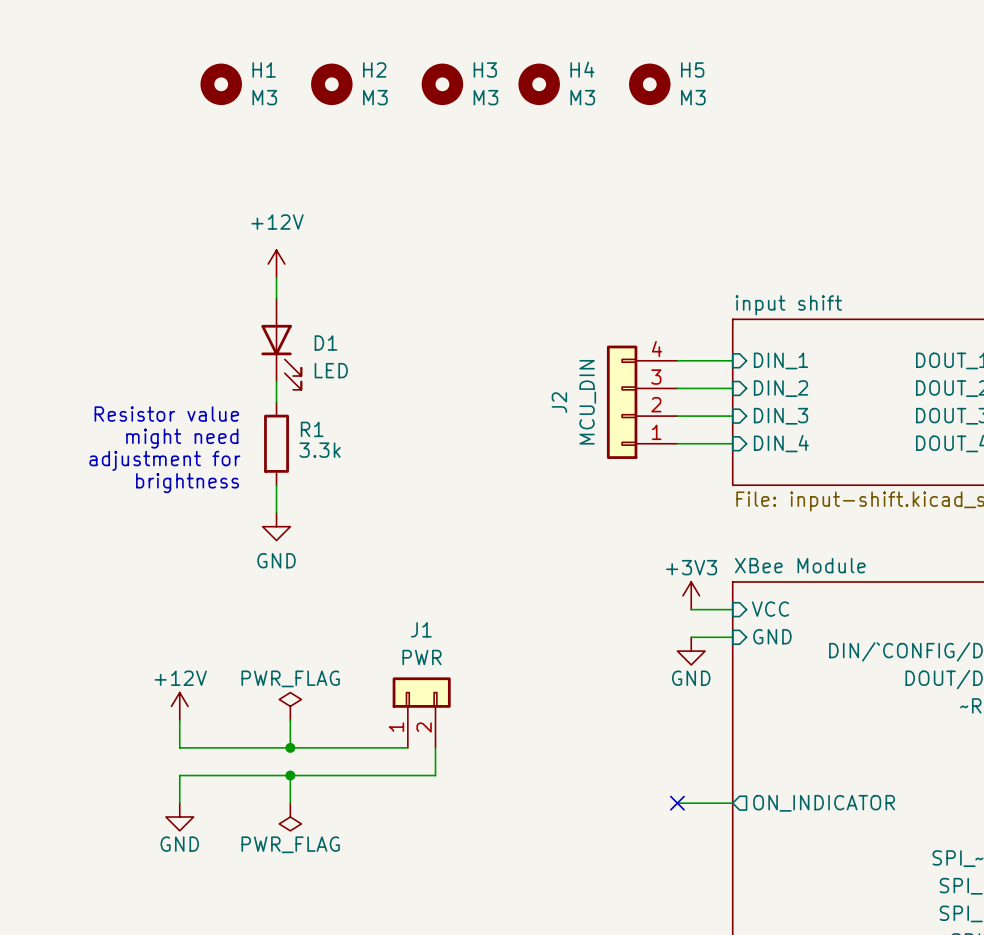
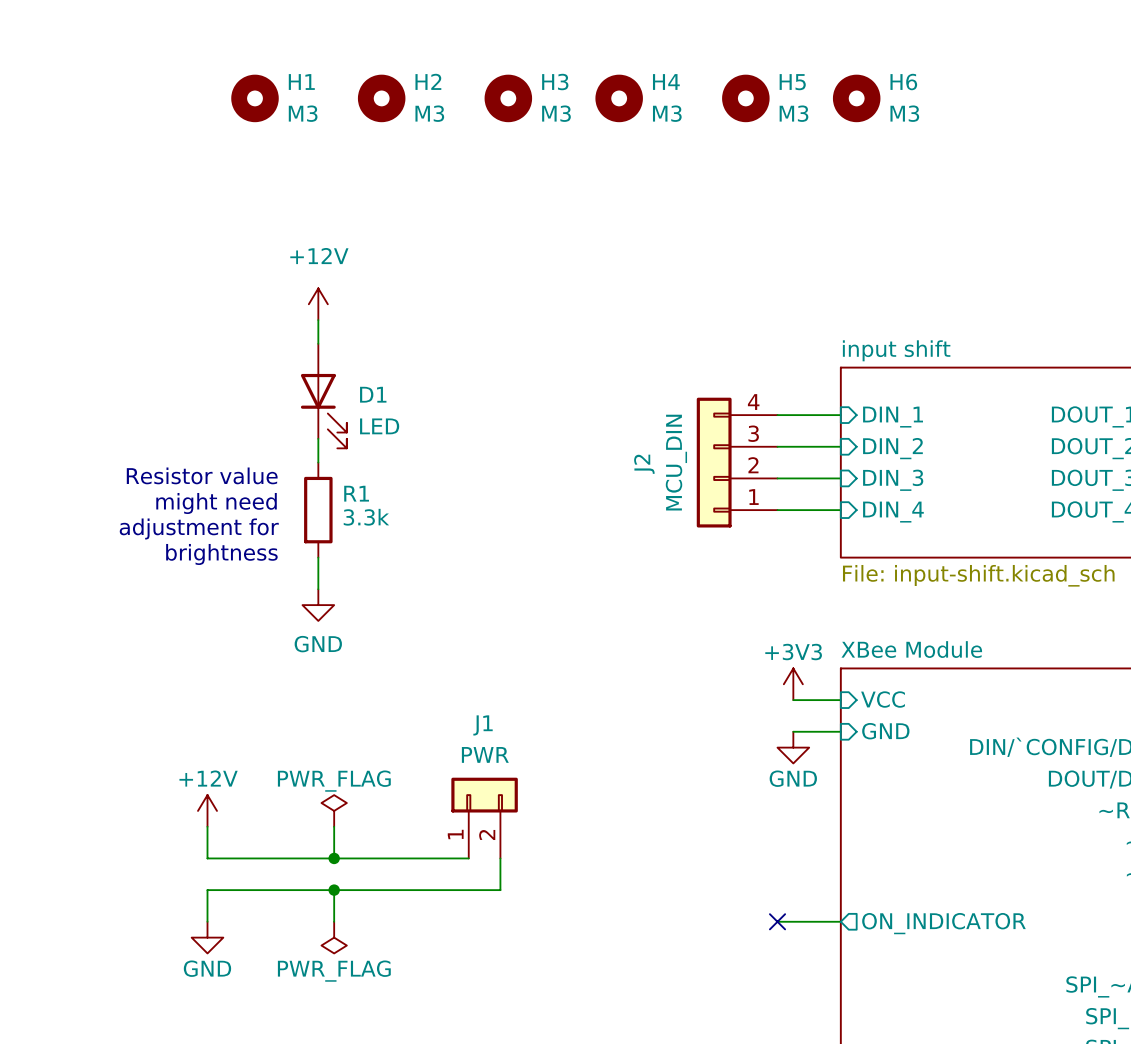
H6: none -> M3 (856, 98)

